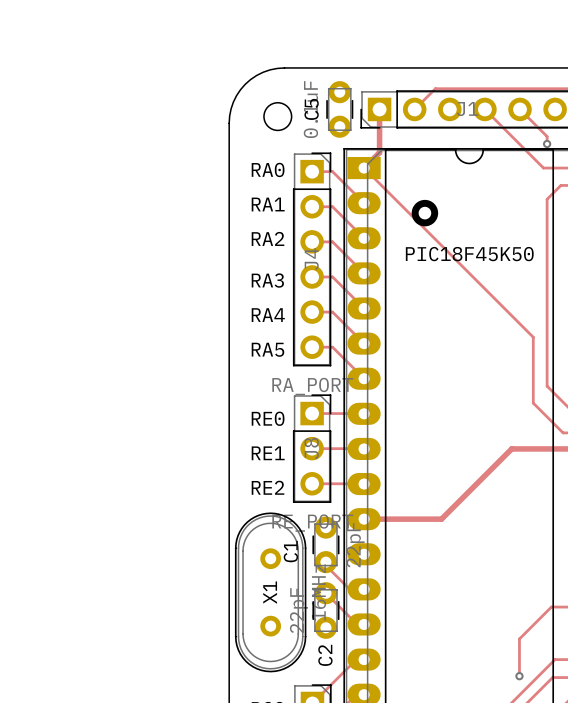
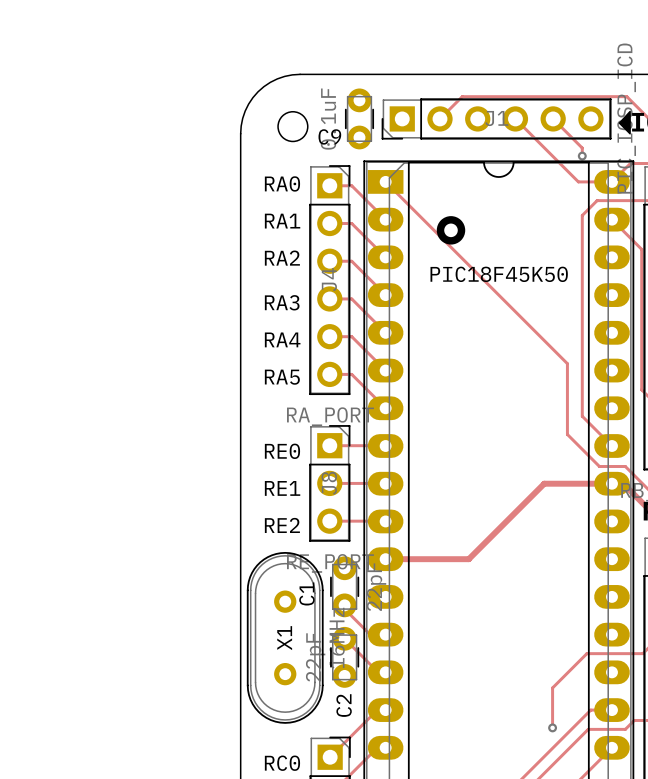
C5 name: C5 (311, 109) -> C9 (329, 136)
track: (379, 109) (379, 152) (364, 168) -> none

